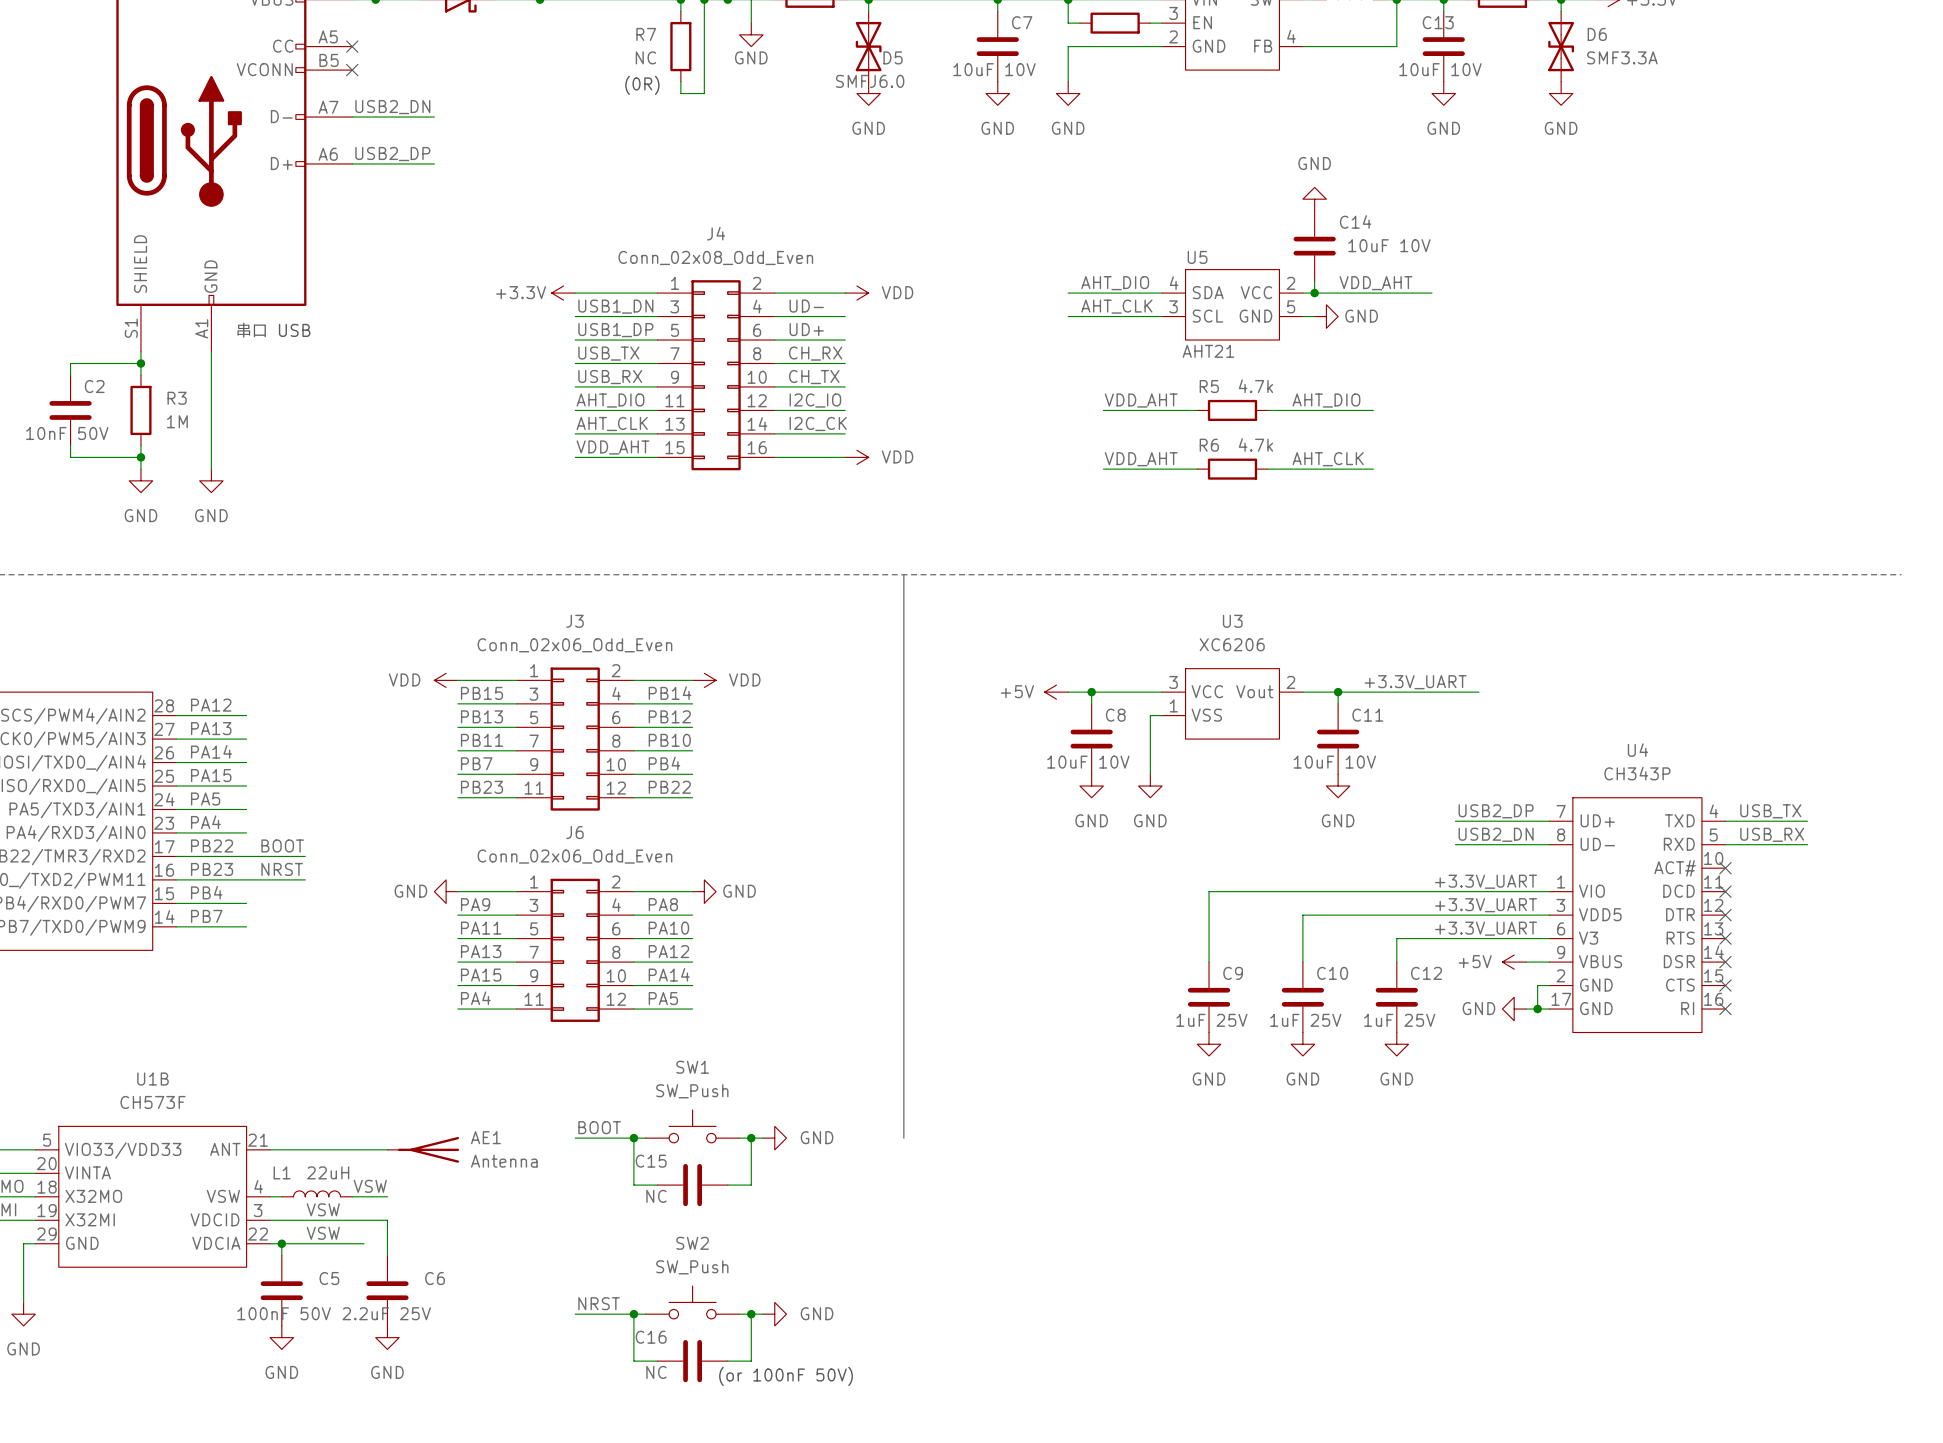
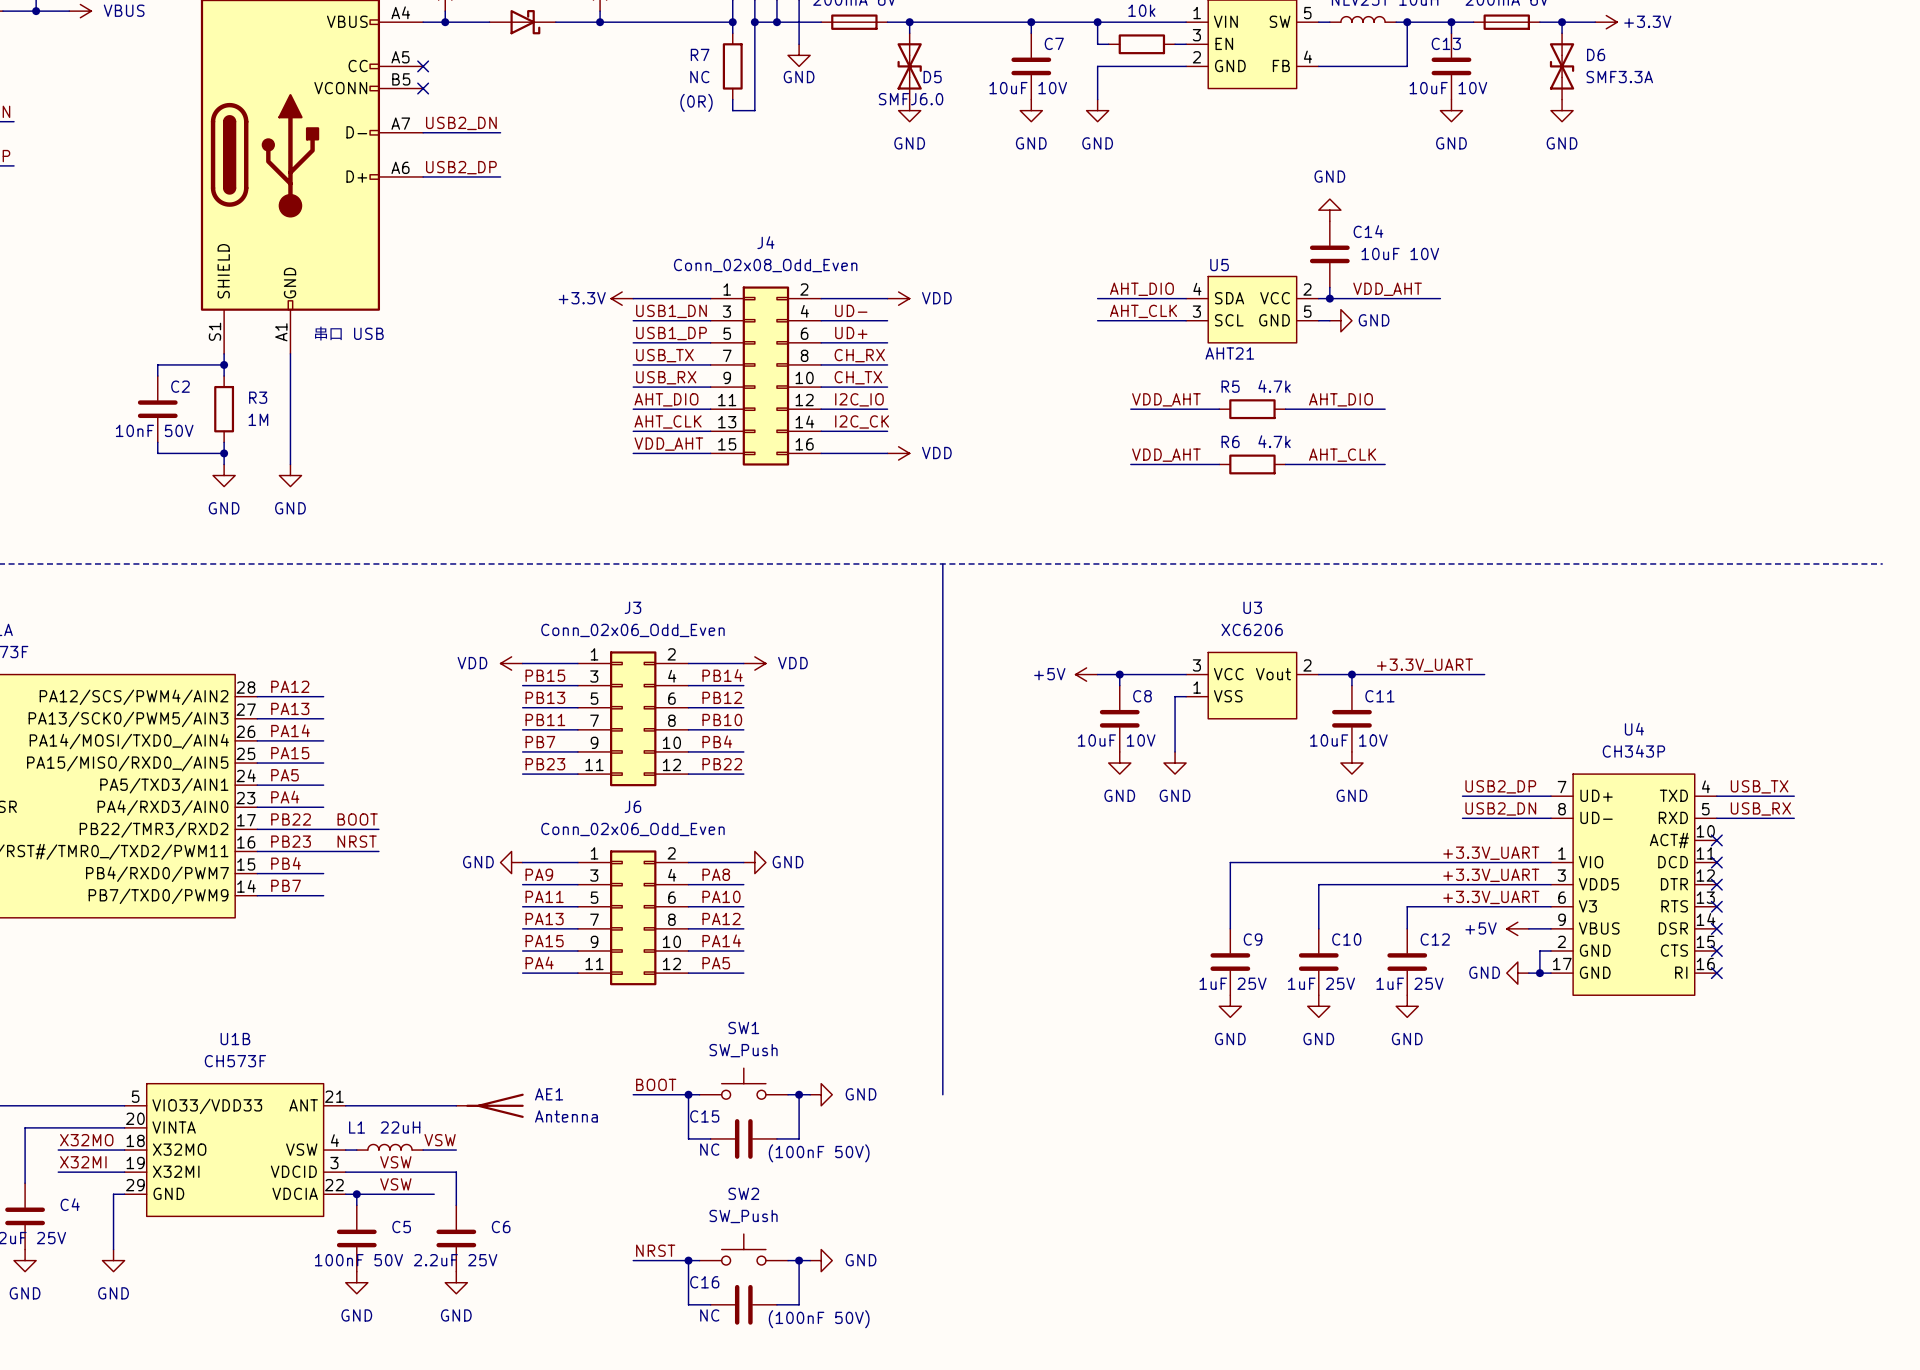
text: none -> (100nF 50V) (819, 1153)
text: (or 100nF 50V) (786, 1376) -> (100nF 50V) (819, 1319)

